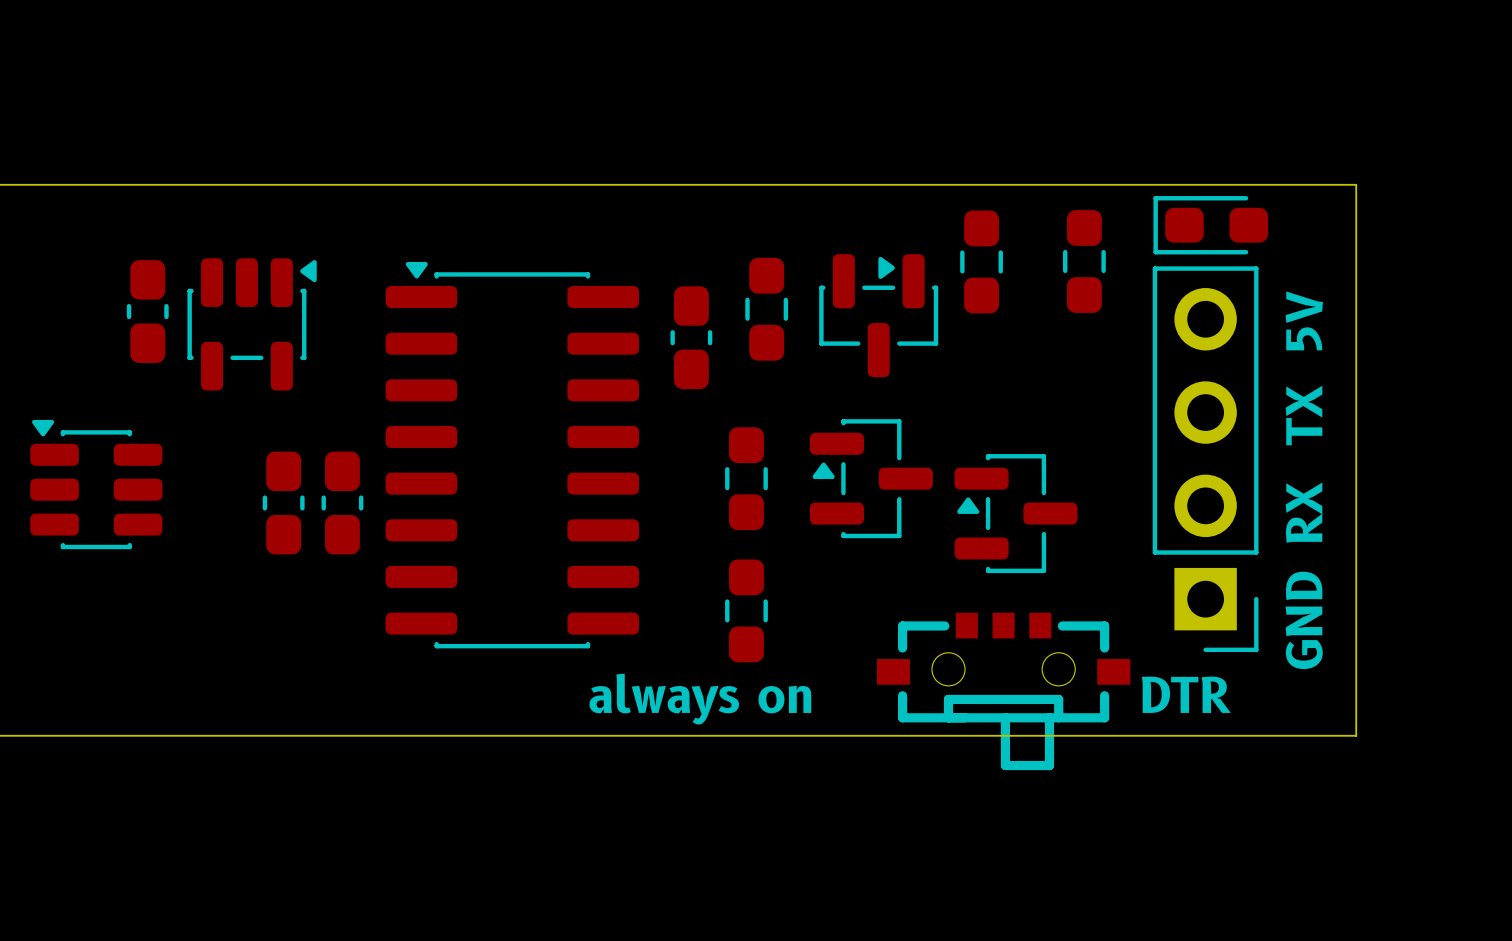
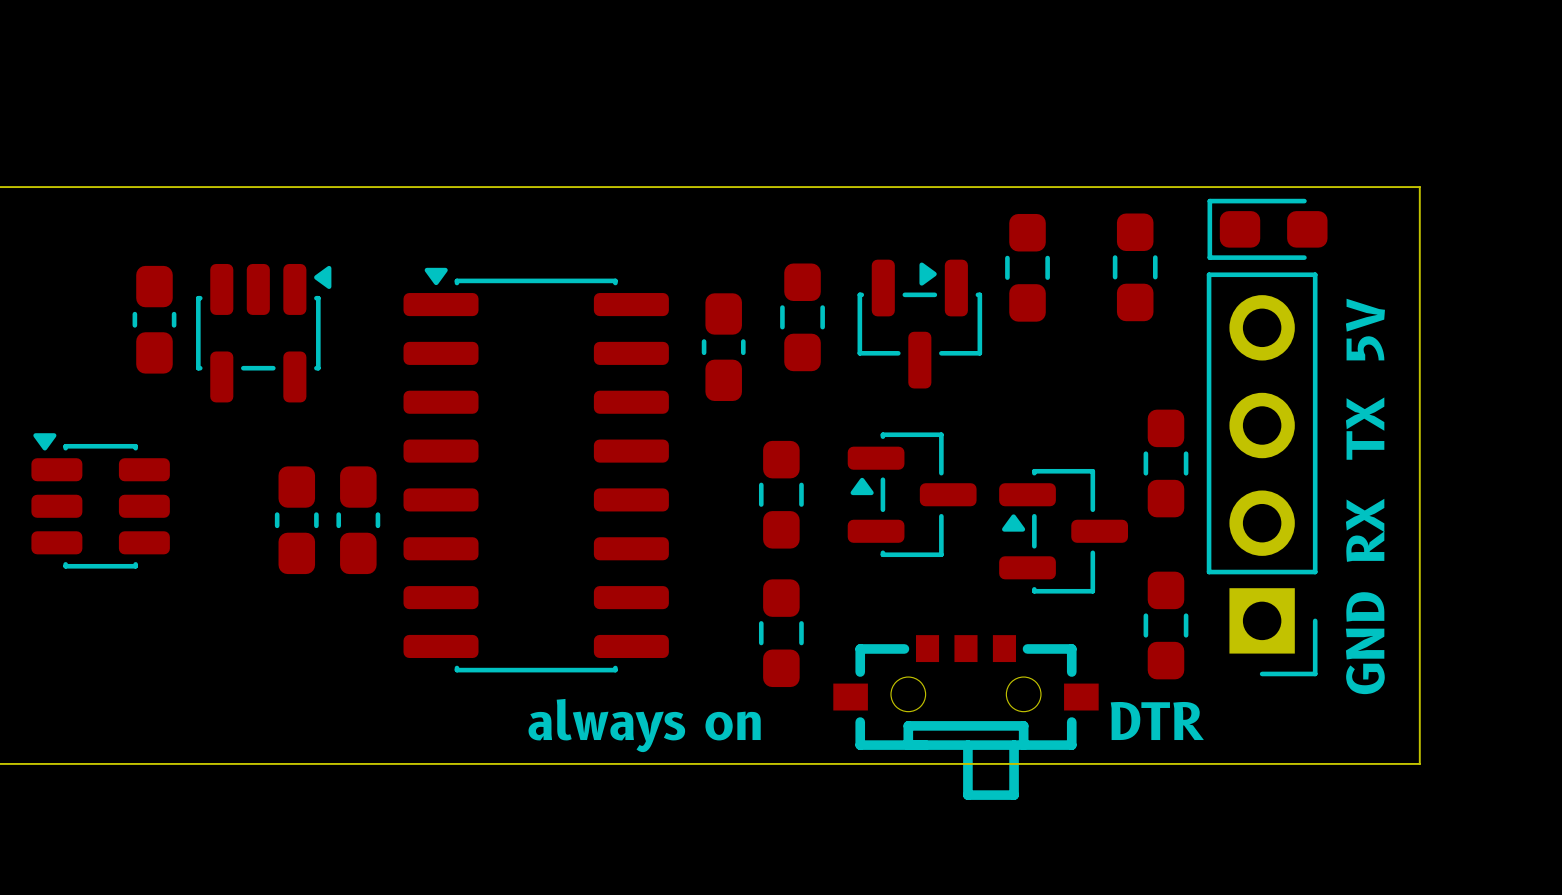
part: none -> (1165, 463)
part: none -> (1165, 625)
part position: (1003, 691) -> (965, 717)
text position: DTR (1186, 694) -> DTR (1157, 720)
text position: always on (700, 699) -> always on (644, 725)

